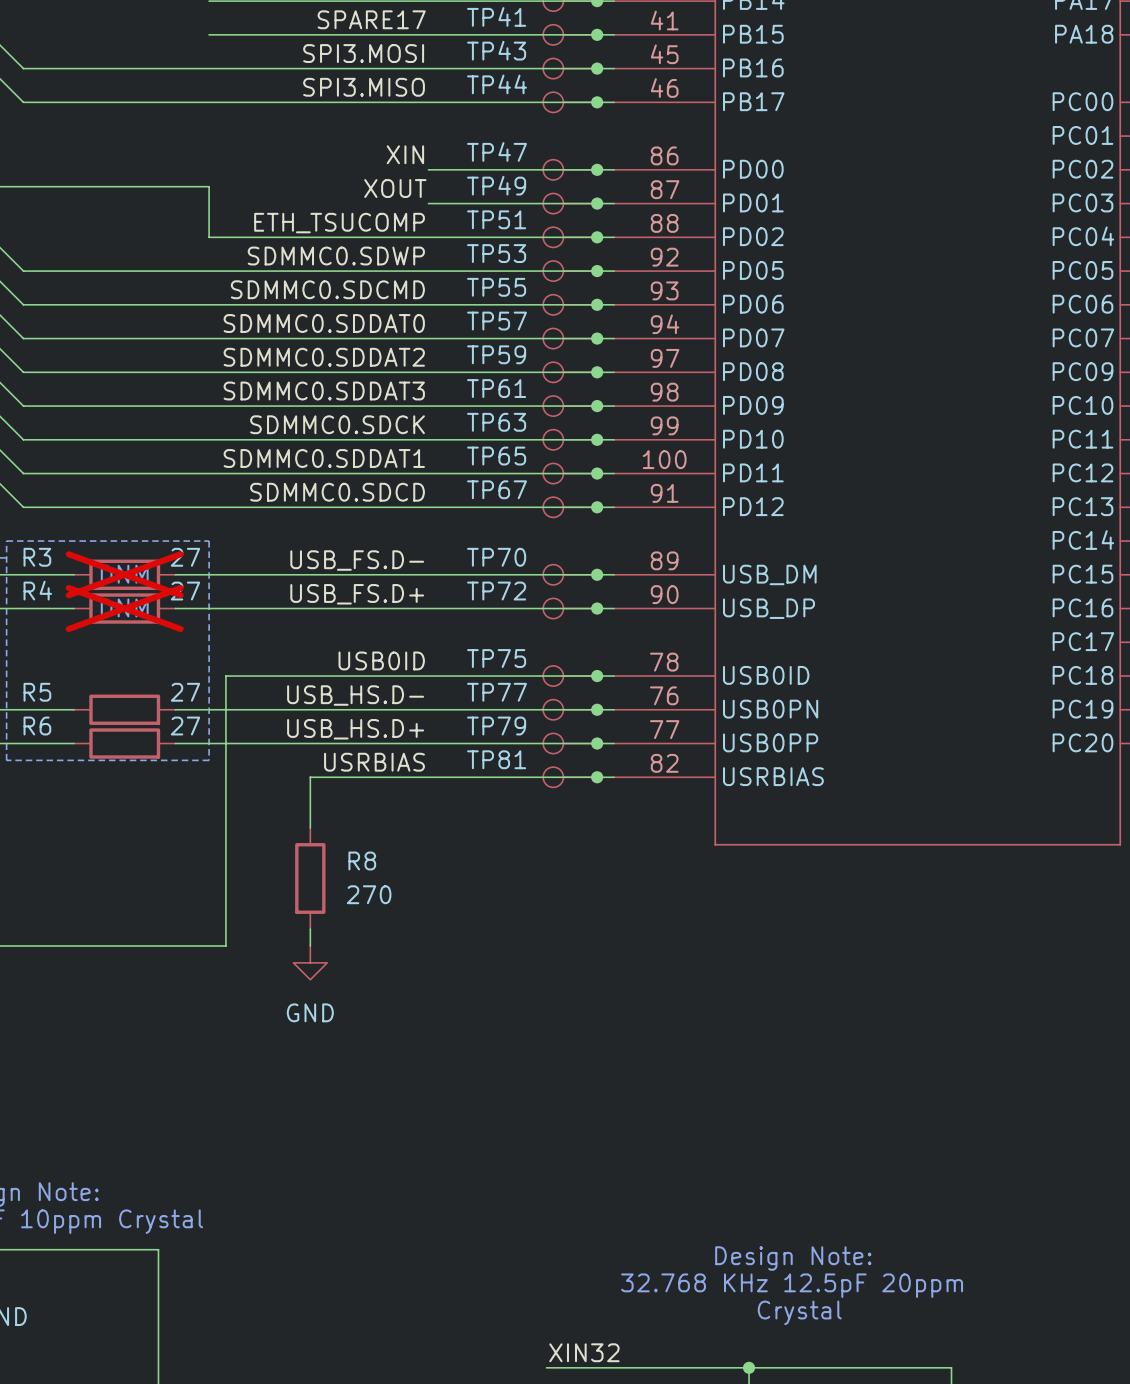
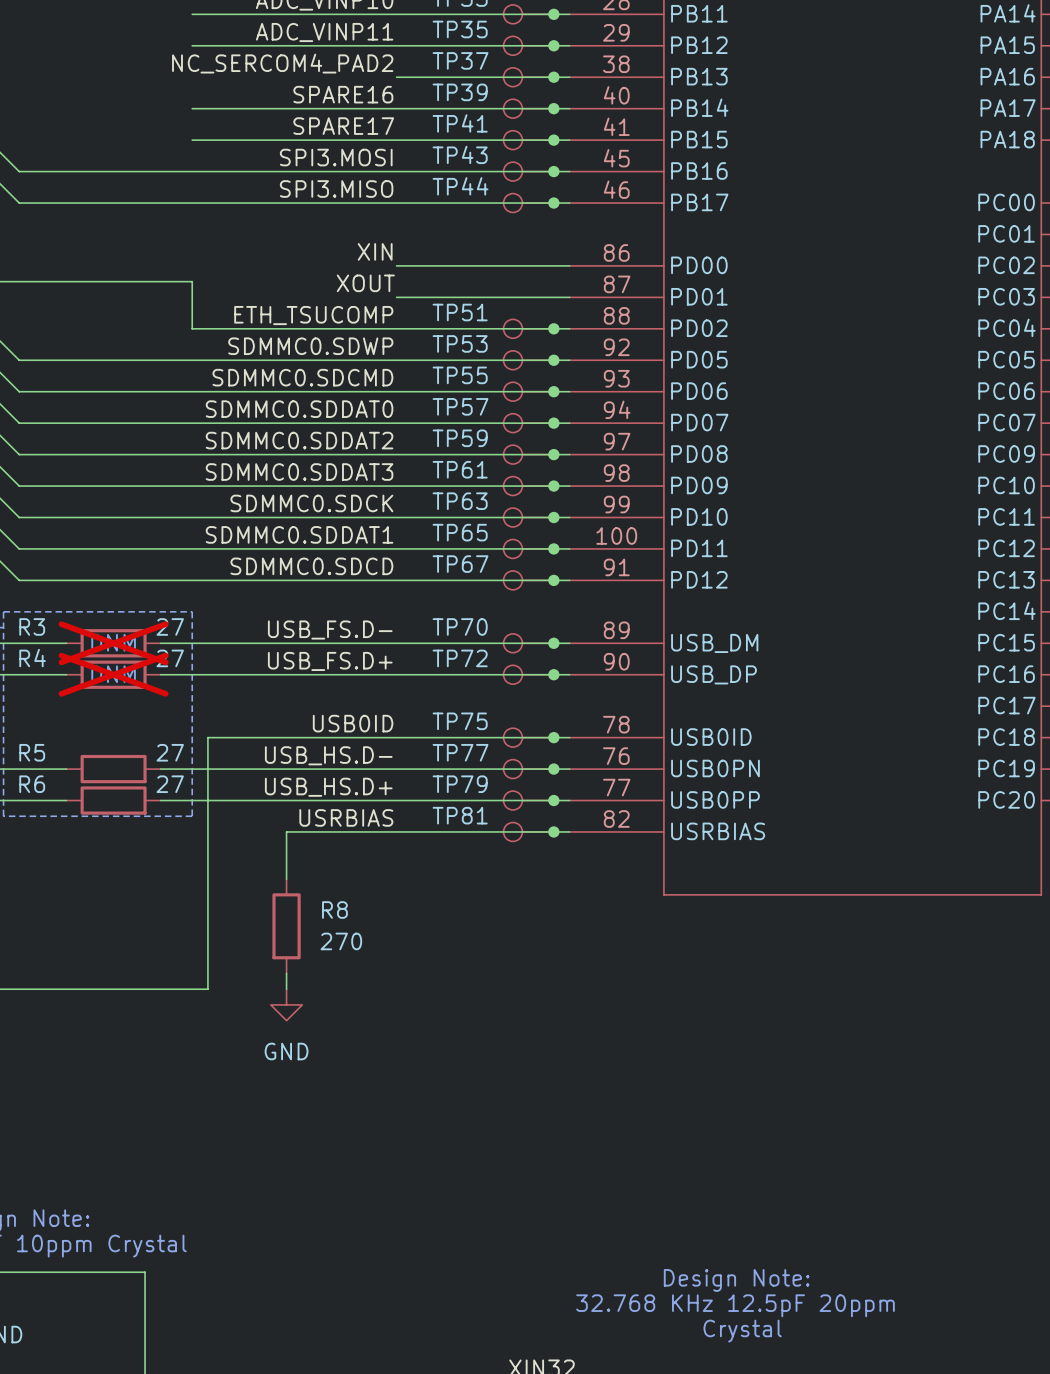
TP47: (570, 169) -> none
junction: (597, 169) -> none
TP49: (570, 203) -> none
junction: (597, 203) -> none

